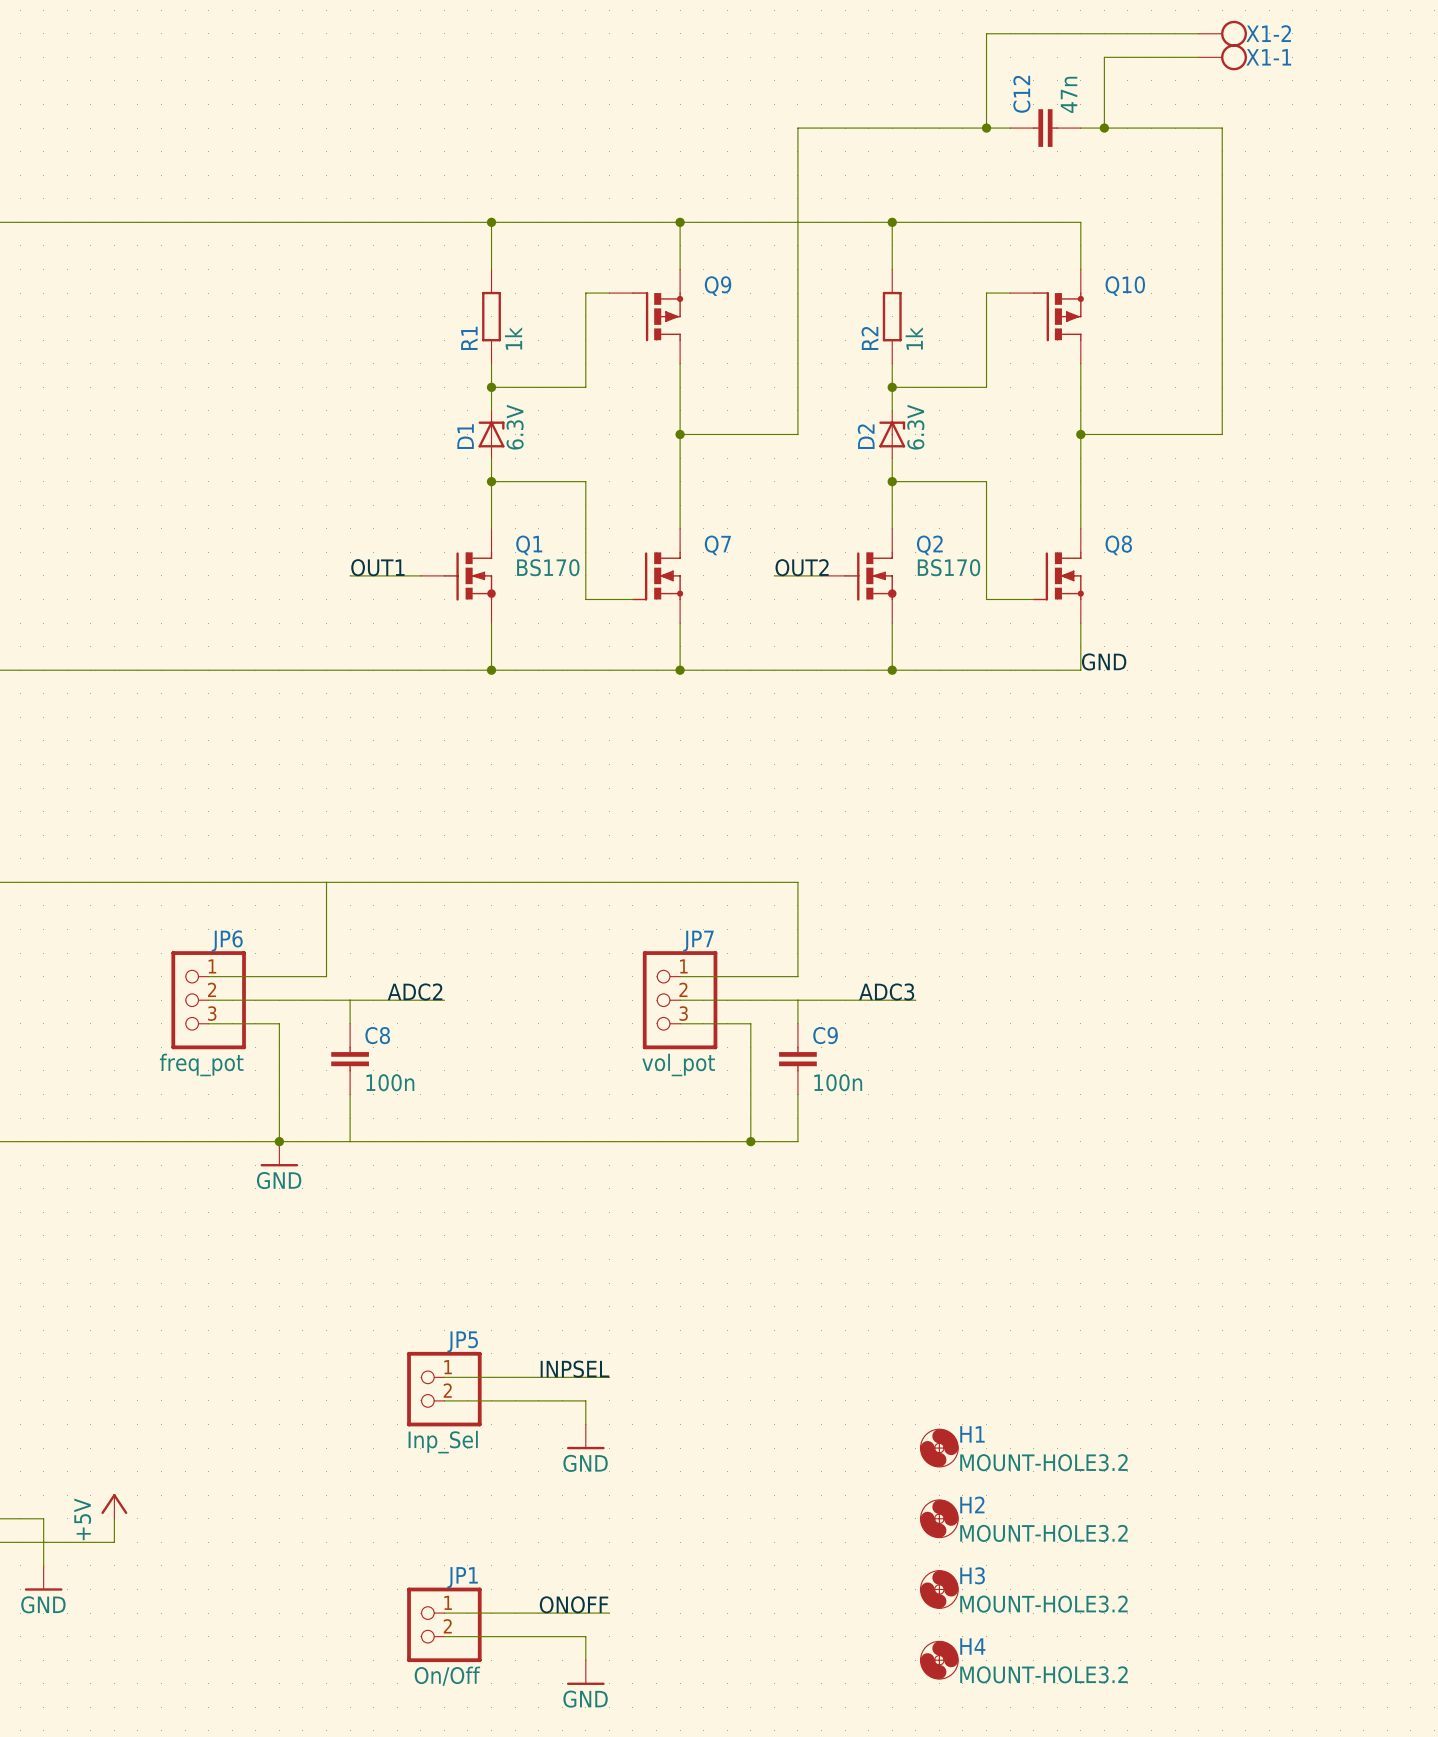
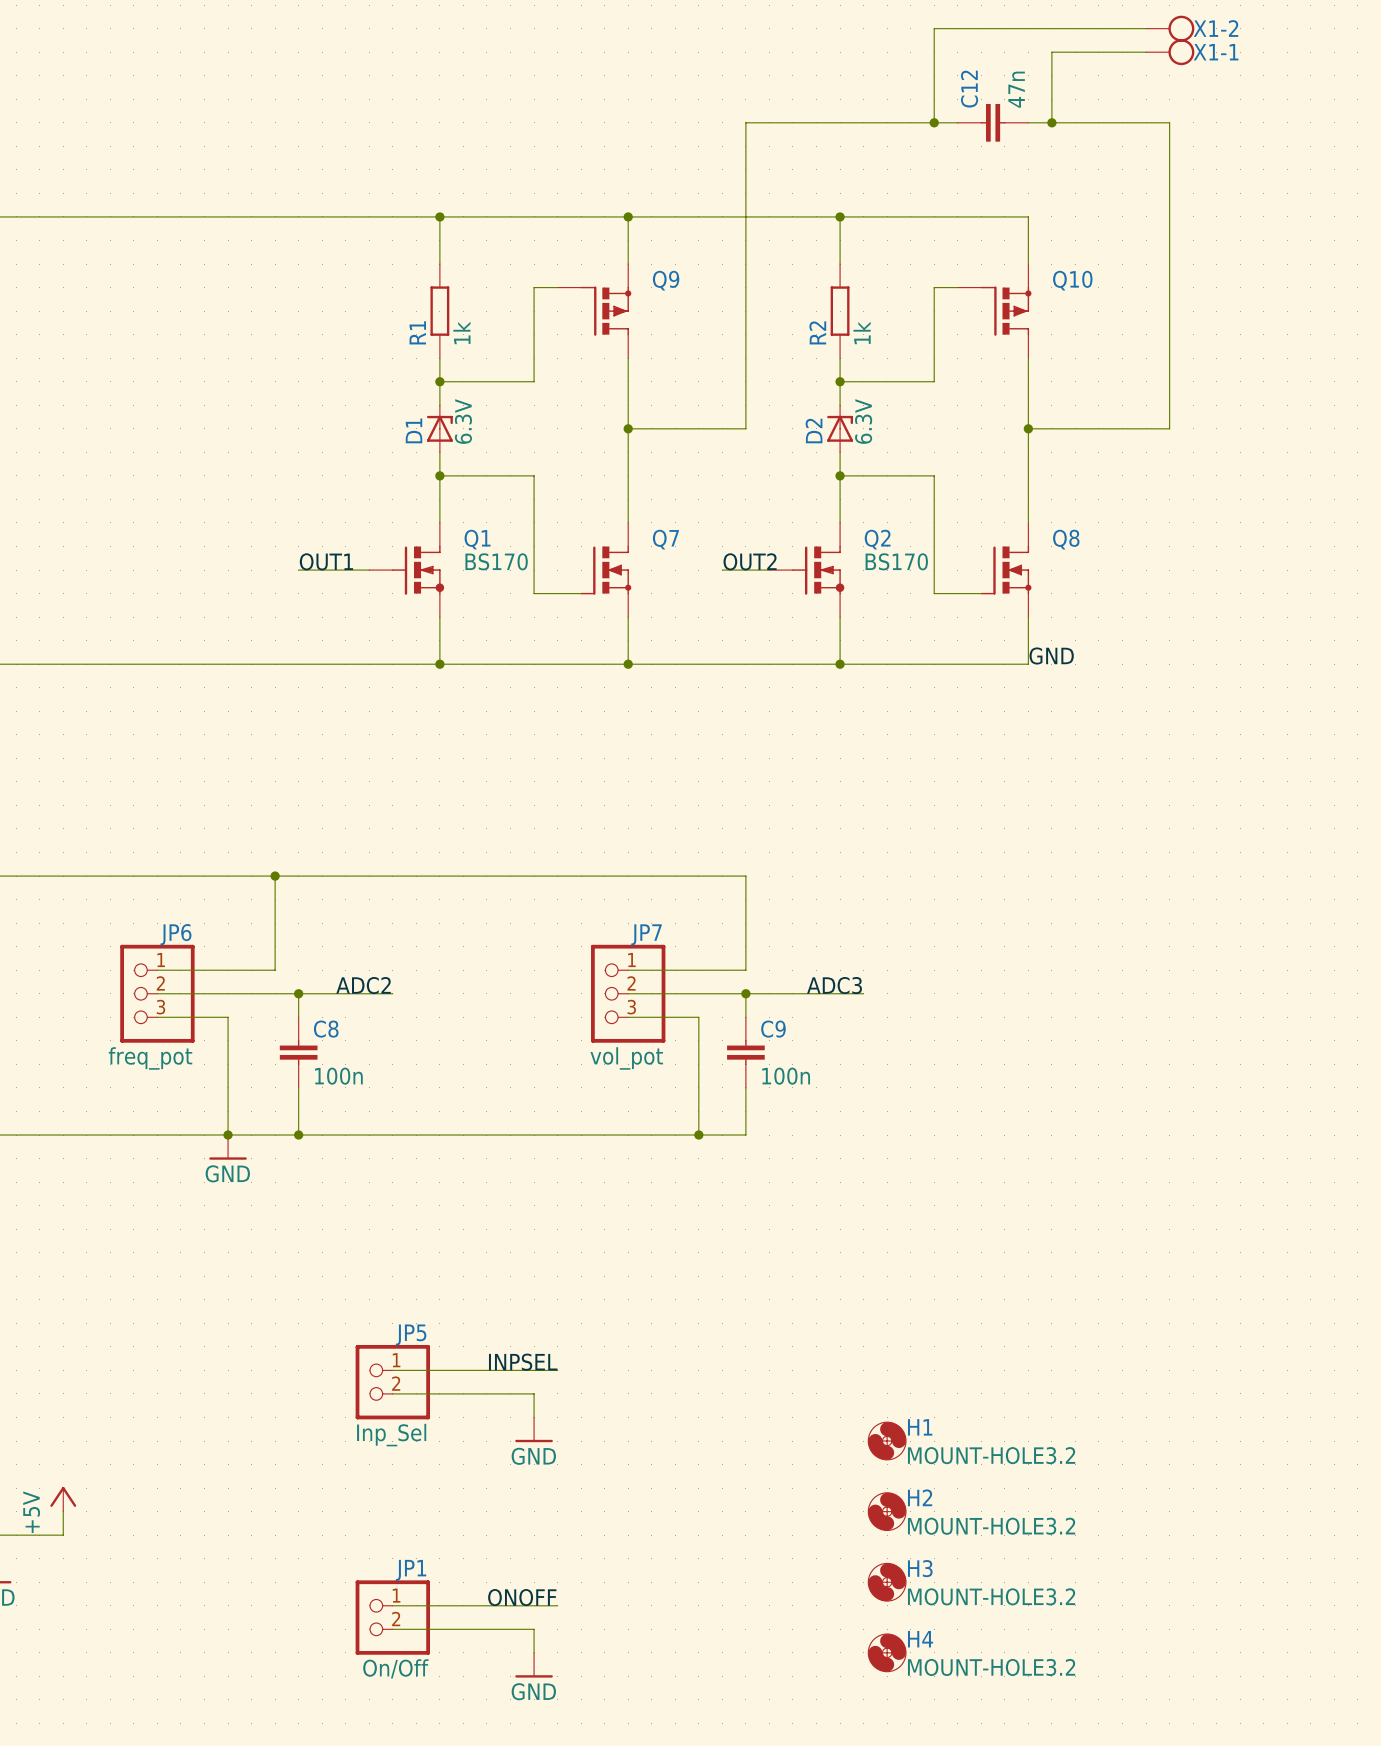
junction: none -> (275, 876)
junction: none -> (298, 993)
junction: none -> (745, 993)
junction: none -> (298, 1135)

